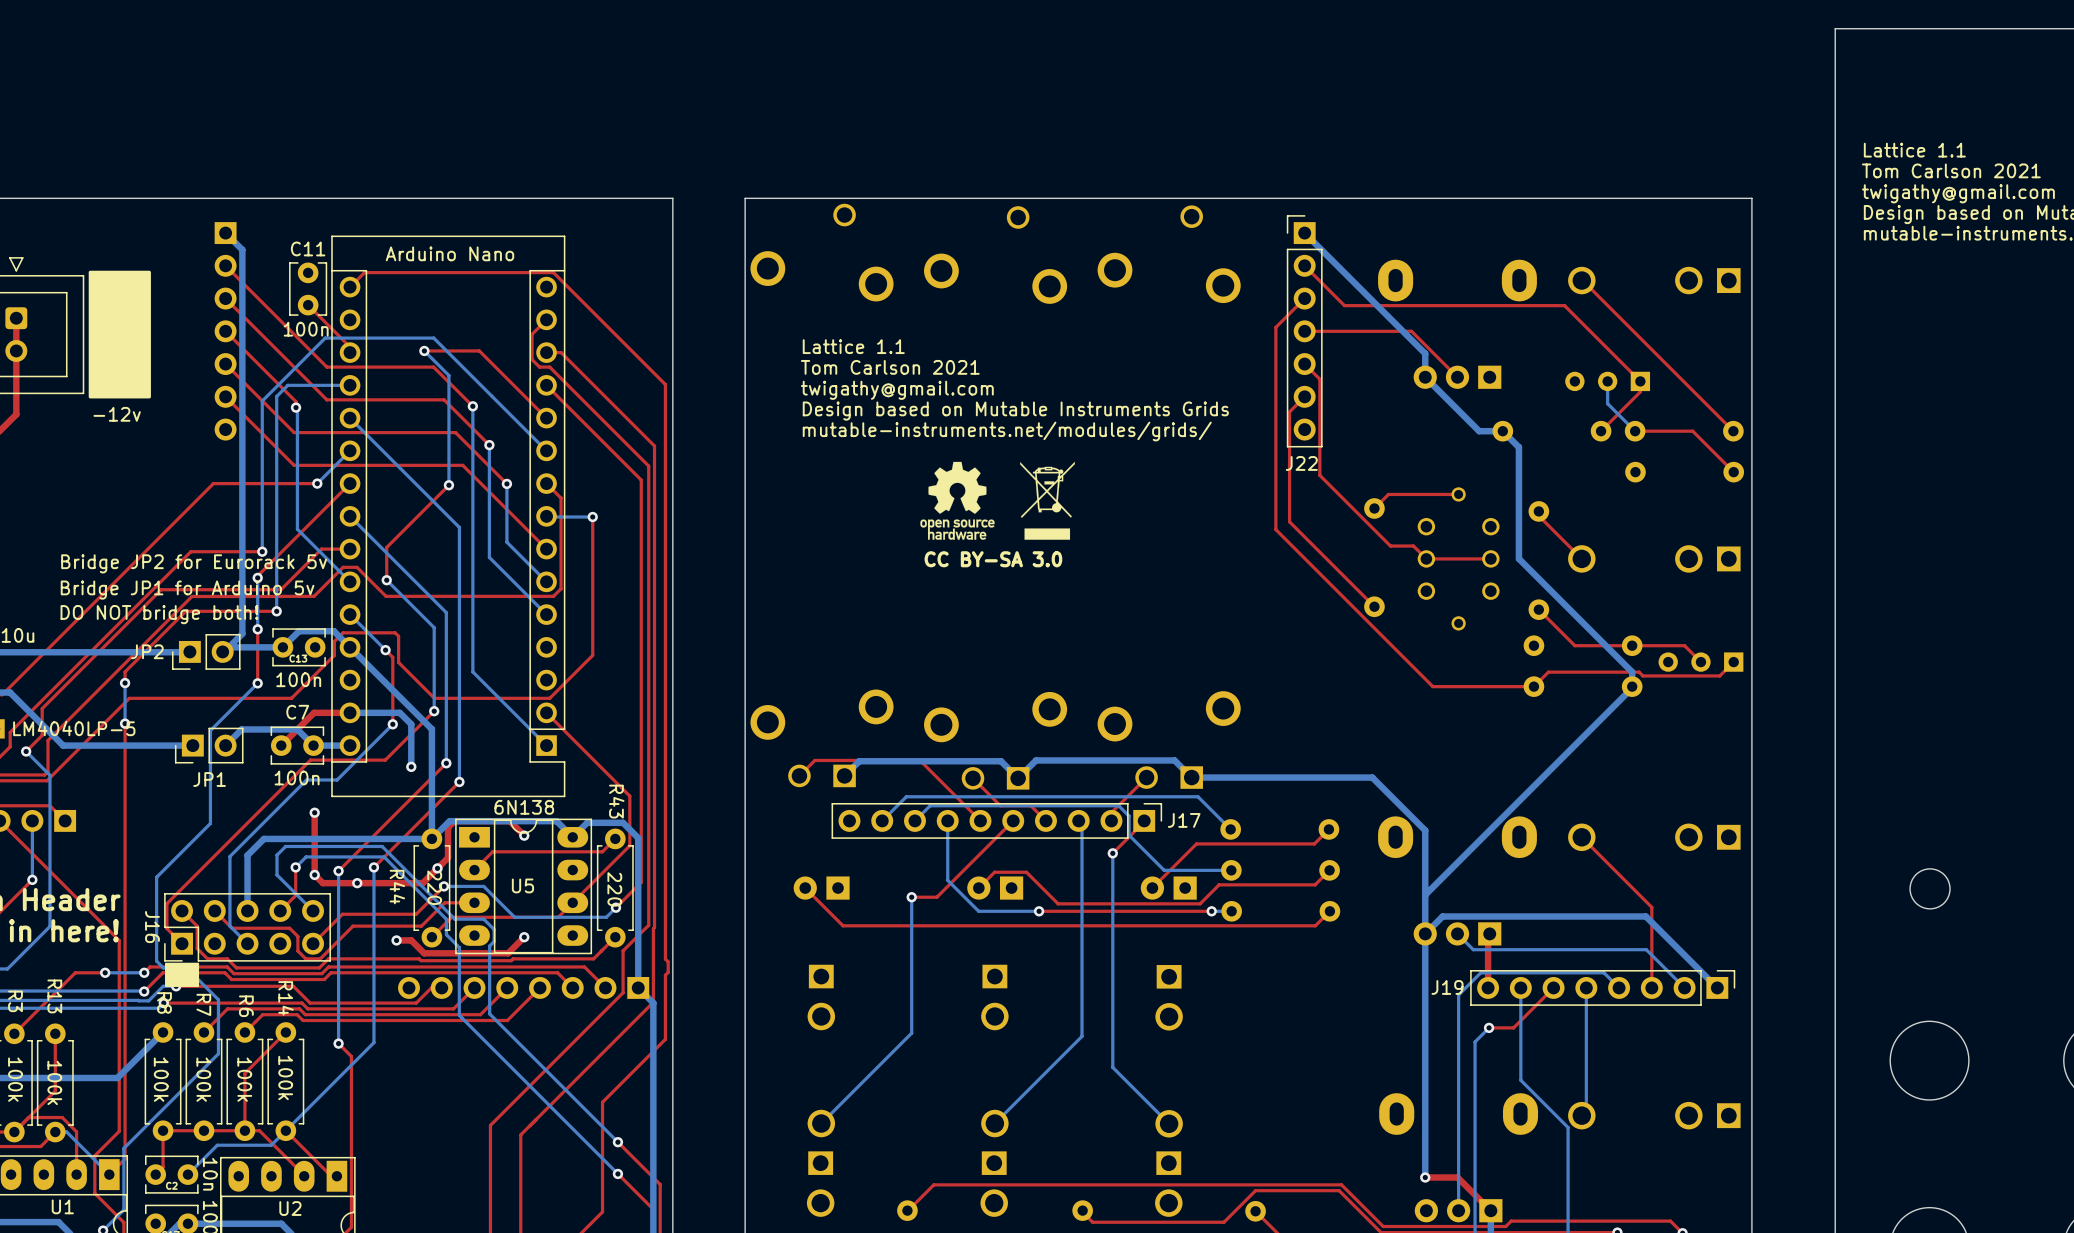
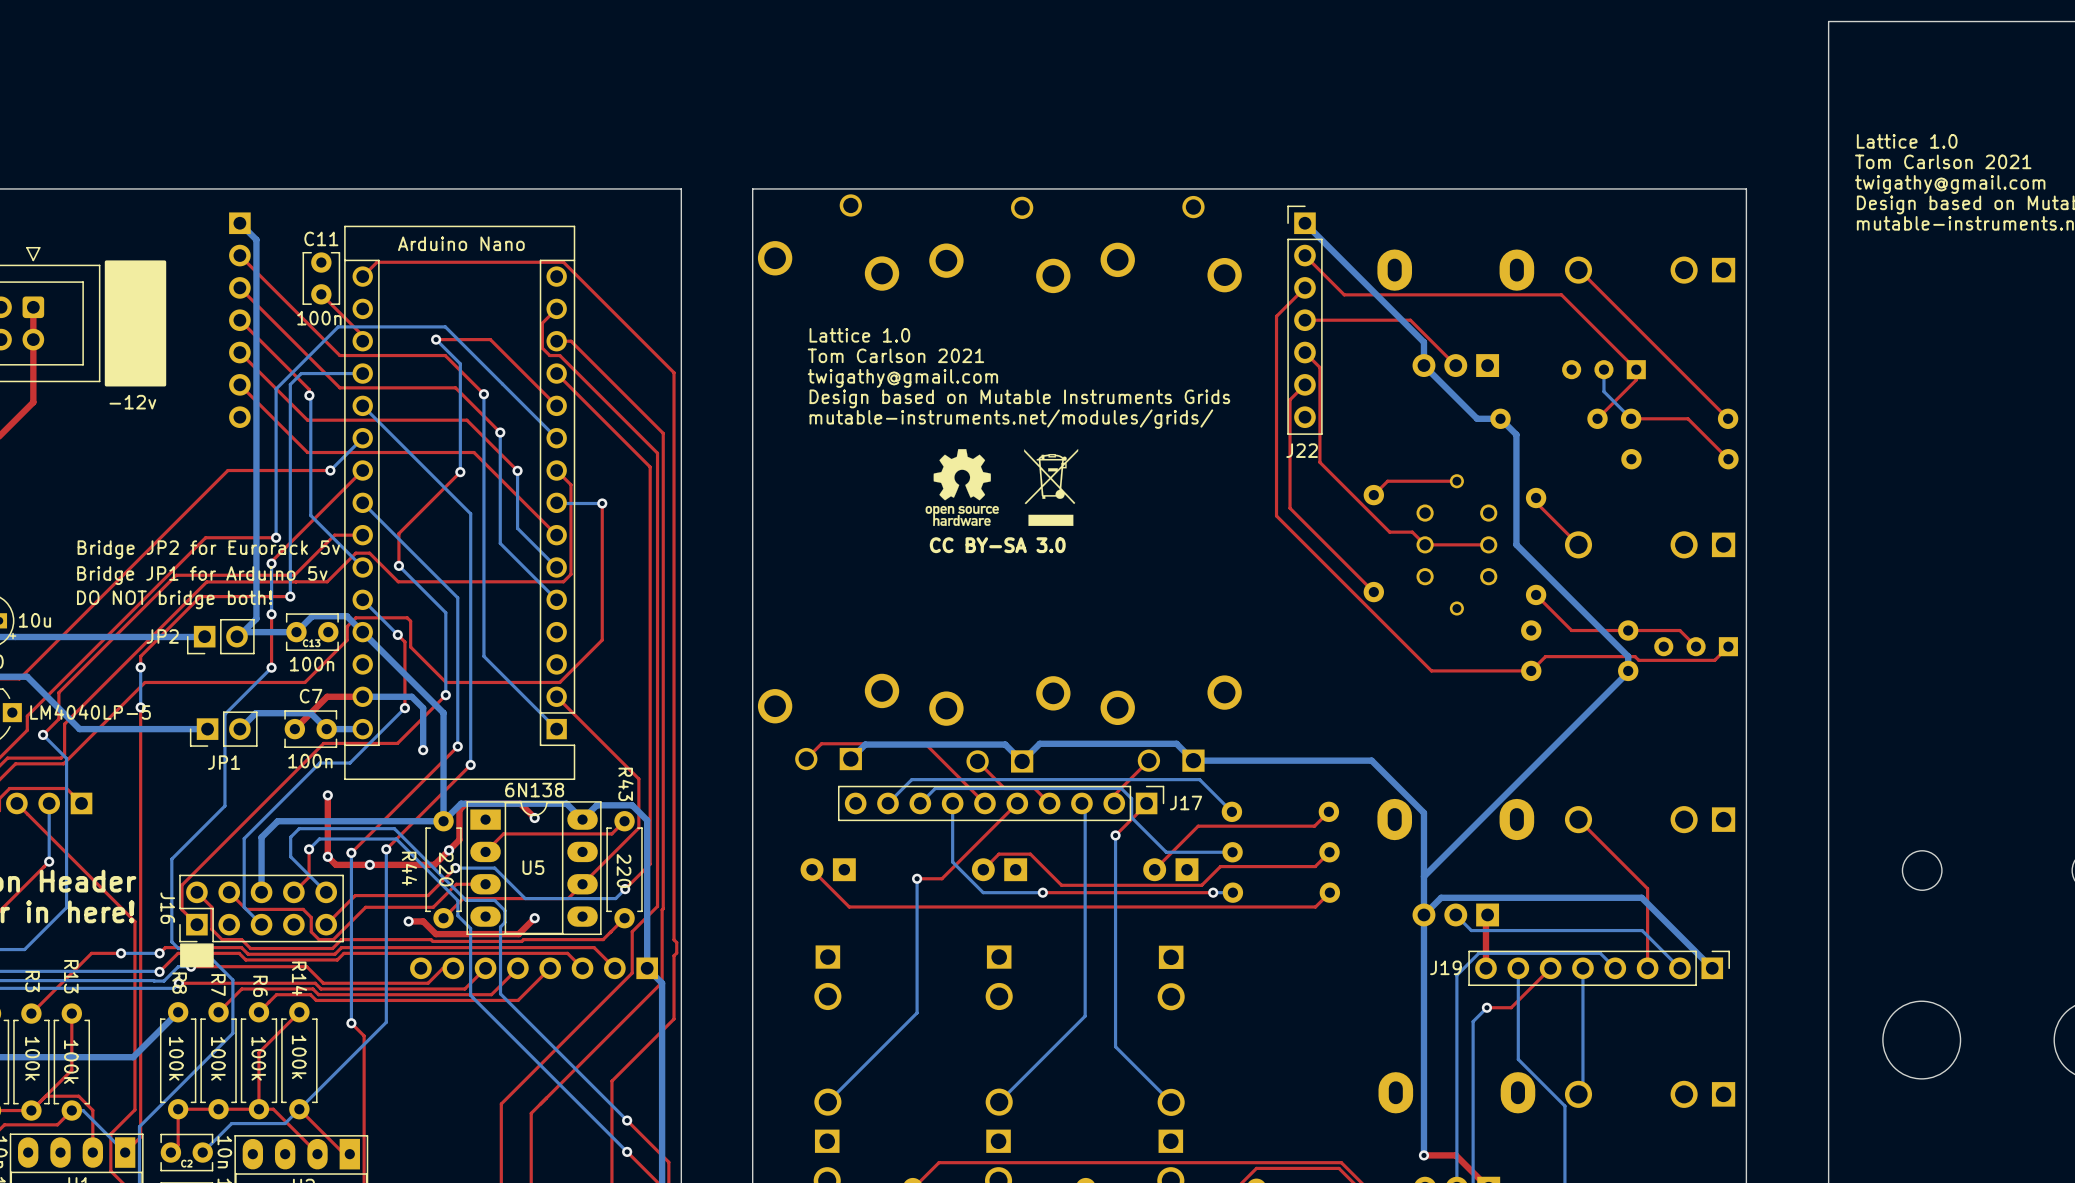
text: Lattice 1.1 (1914, 150) -> Lattice 1.0 (1907, 141)
text: Lattice 1.1 (853, 346) -> Lattice 1.0 (859, 335)

